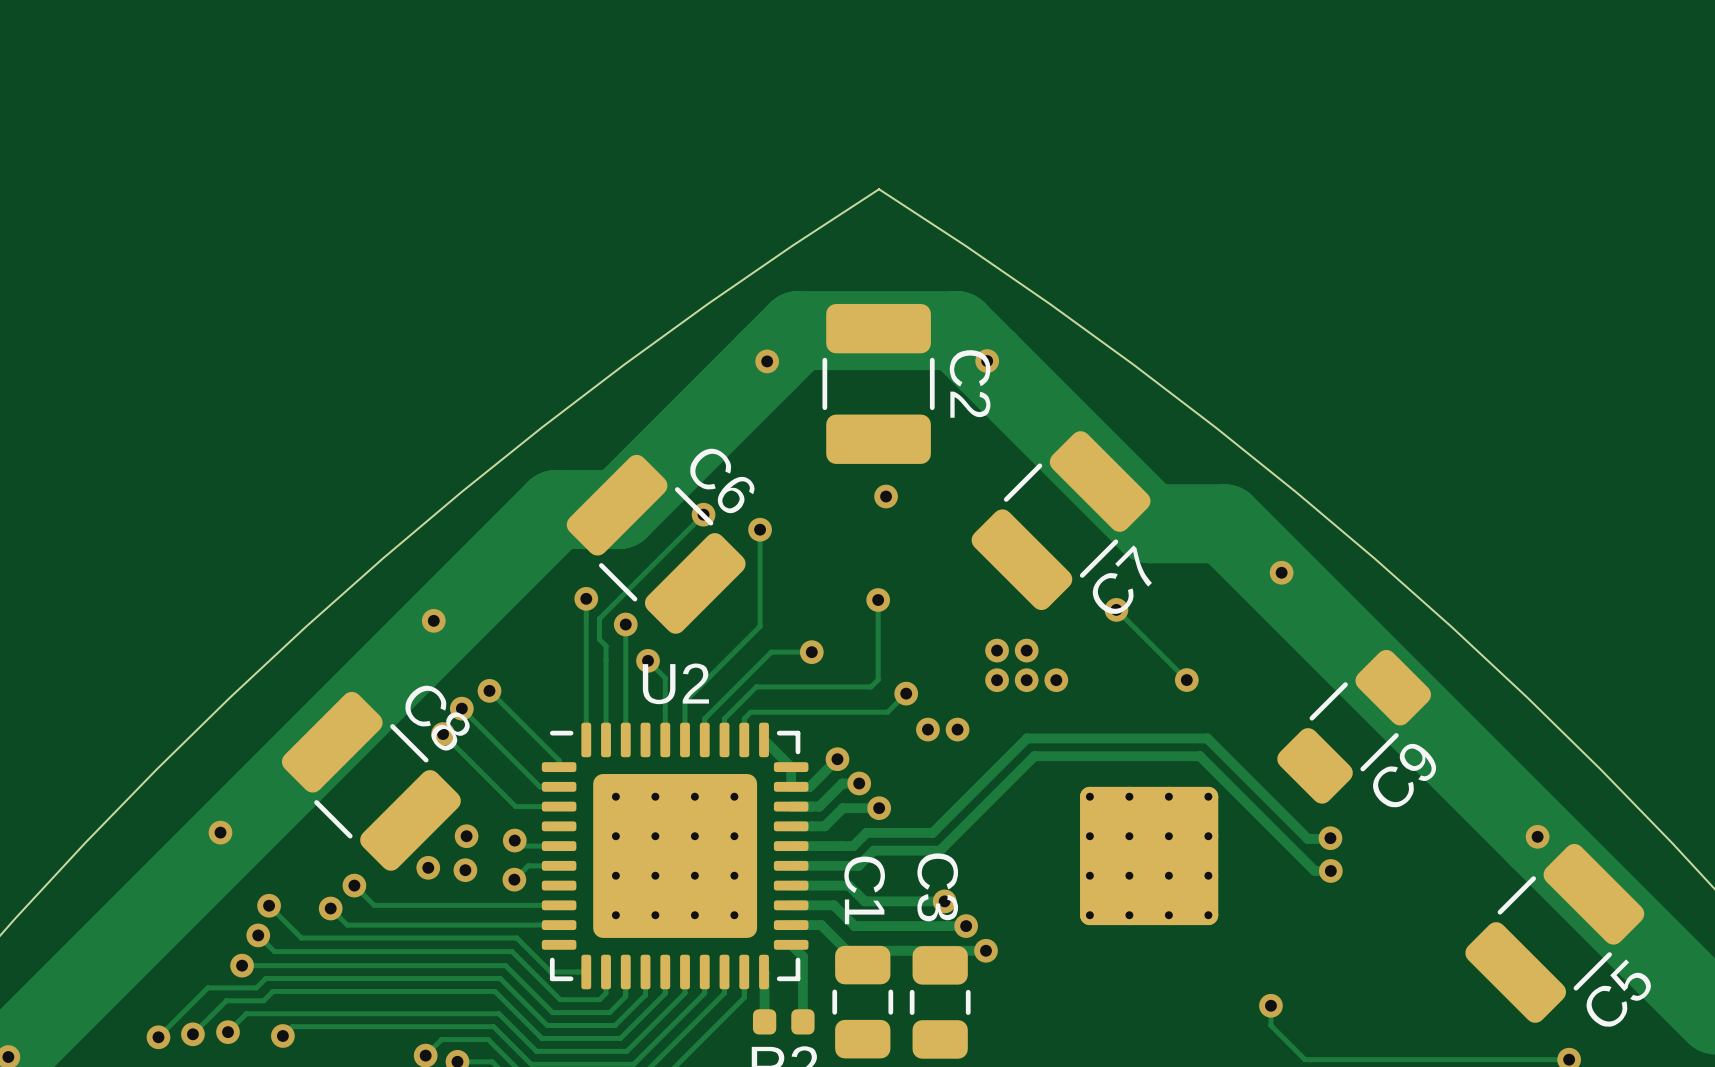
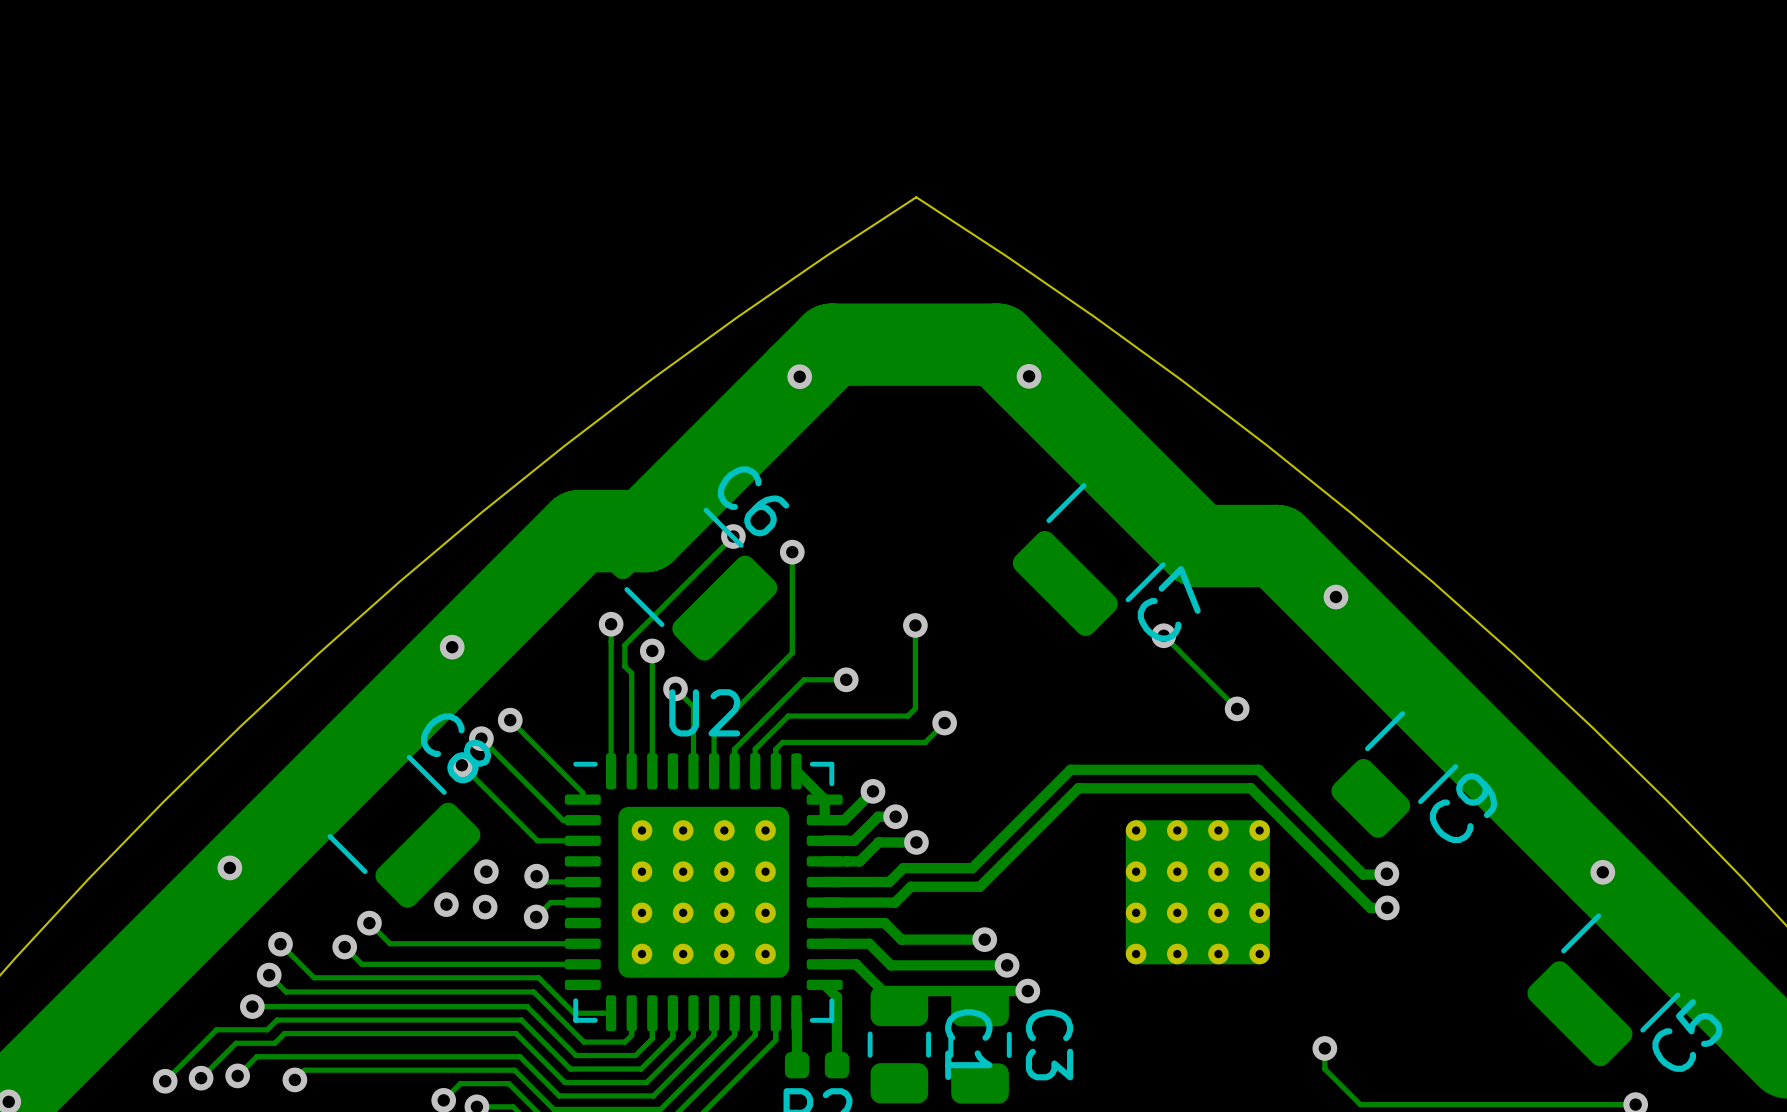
C2: (878, 383) -> none
via: (886, 496) -> none
via: (997, 650) -> none
via: (1026, 650) -> none
via: (997, 680) -> none
via: (1026, 680) -> none
via: (1056, 680) -> none
via: (927, 729) -> none
via: (957, 729) -> none
C3 name position: C3 (937, 887) -> C3 (1049, 1044)
C1 name position: C1 (864, 890) -> C1 (968, 1044)

